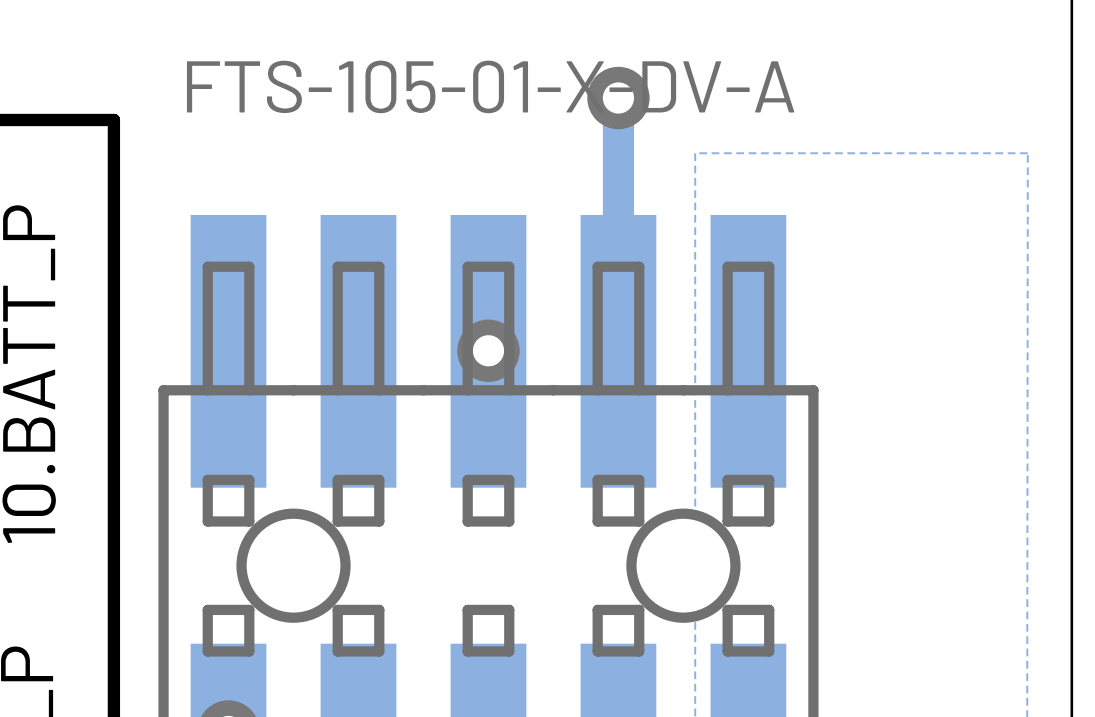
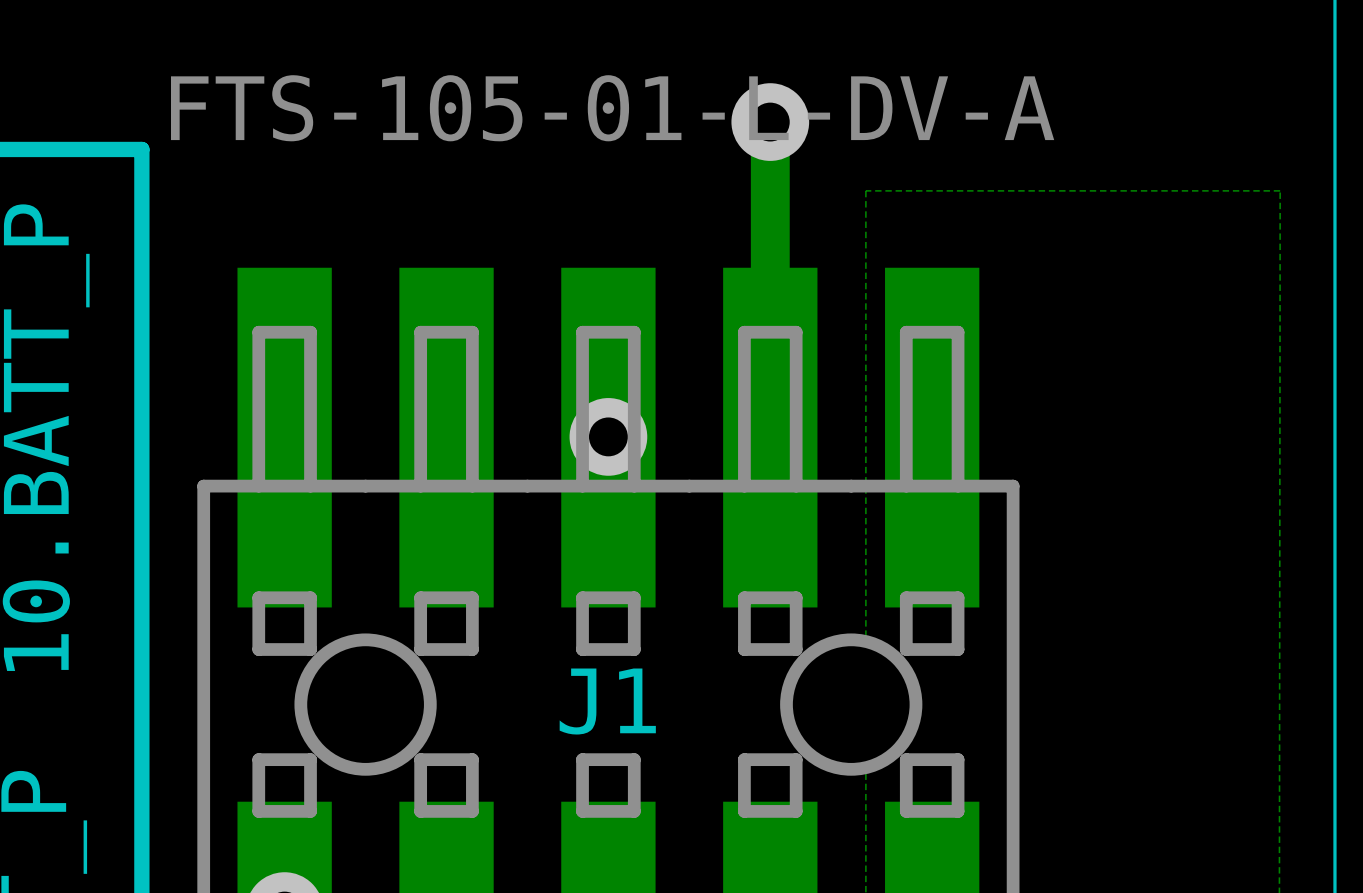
J1 value: FTS-105-01-X-DV-A (490, 86) -> FTS-105-01-L-DV-A (612, 108)
J1 name: none -> J1 (607, 701)

